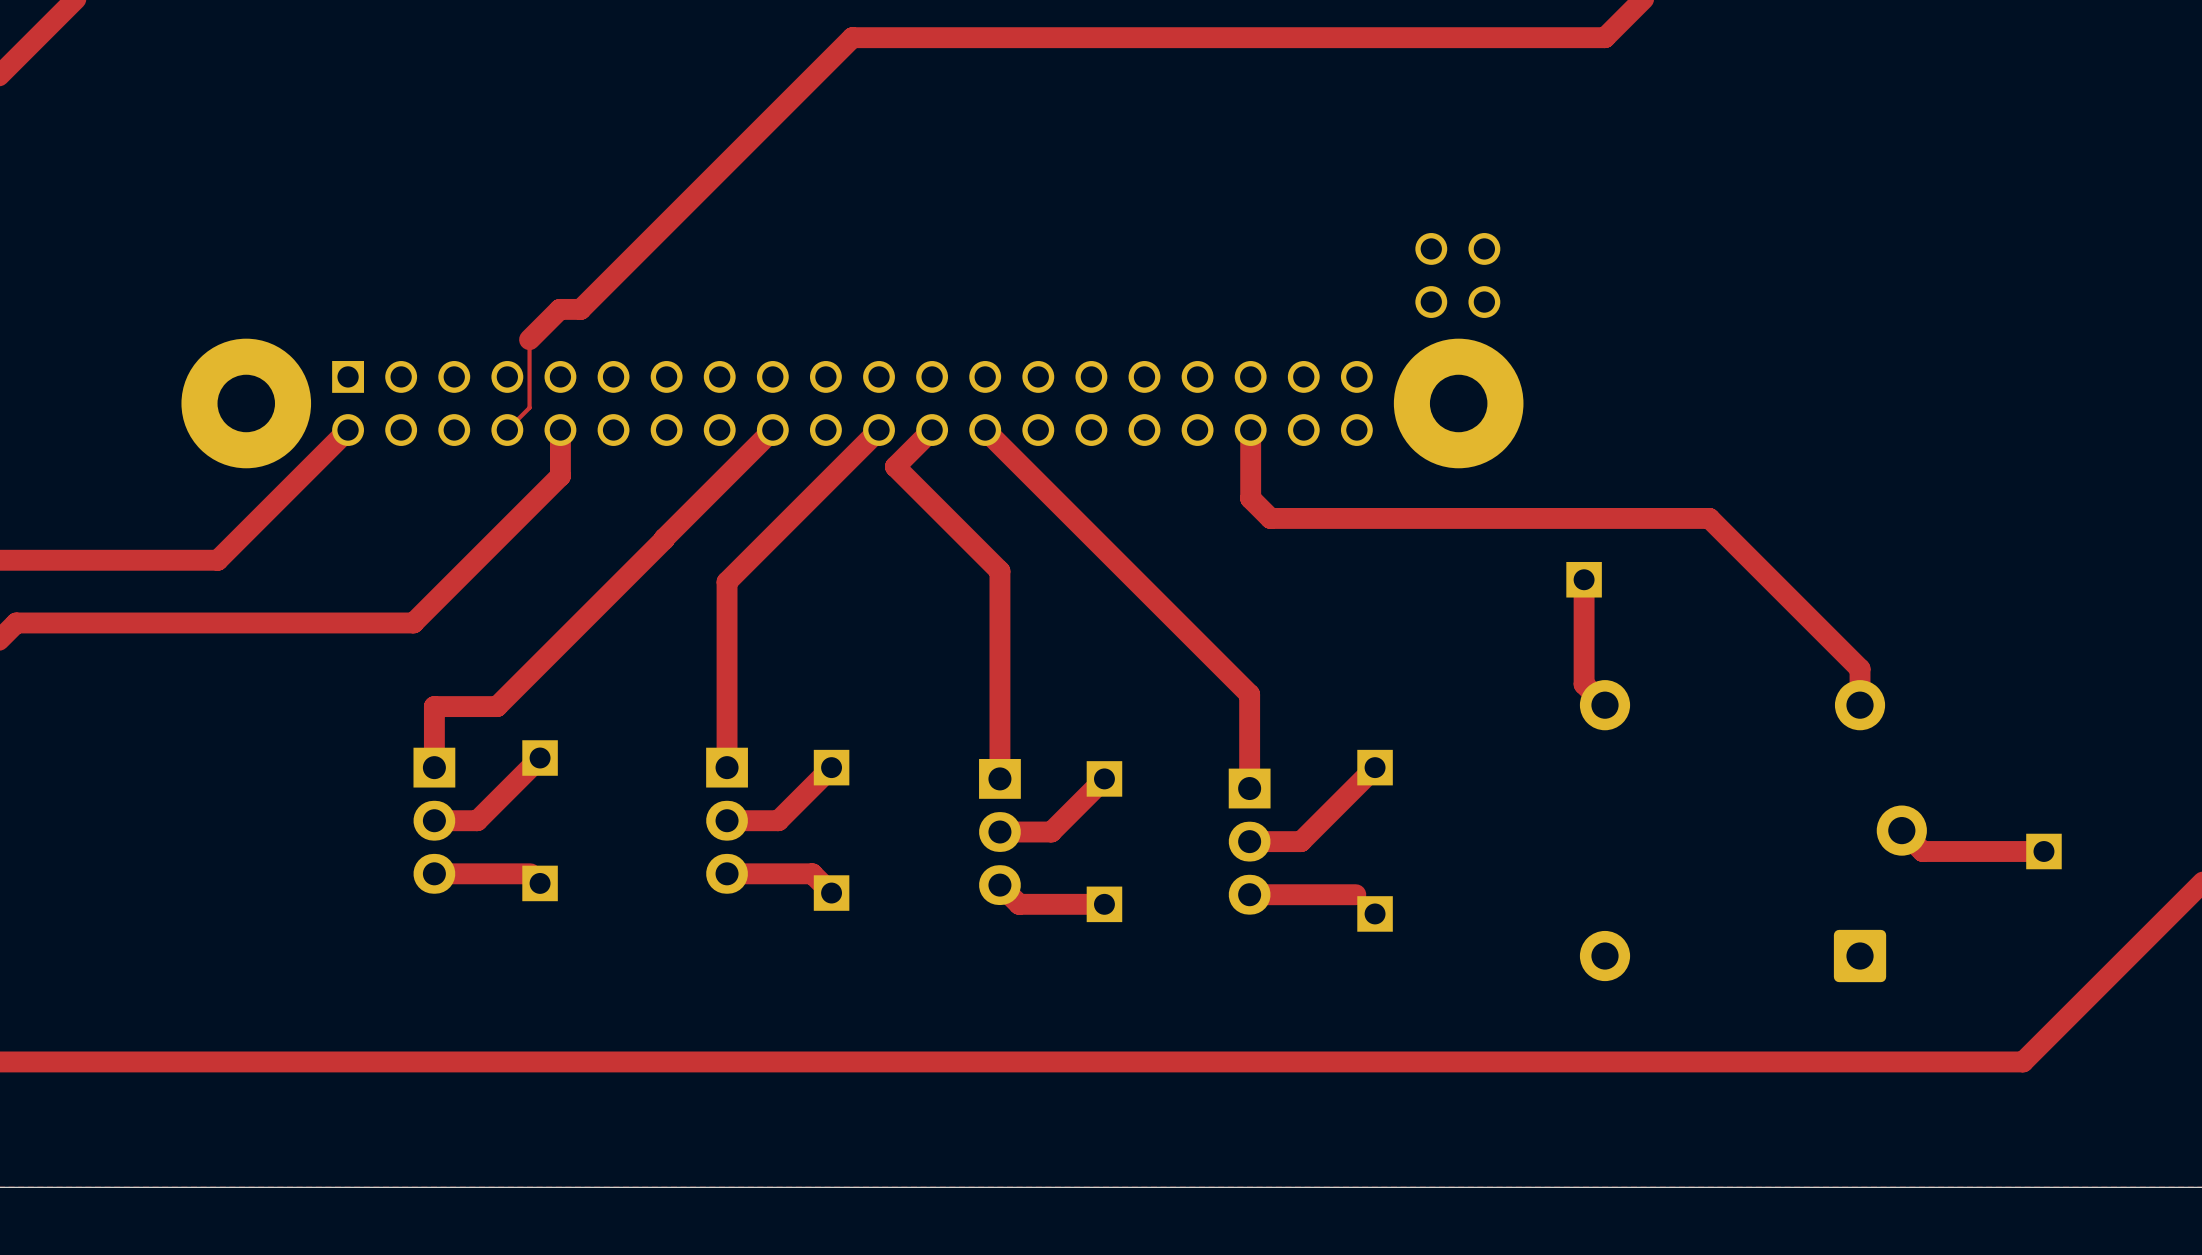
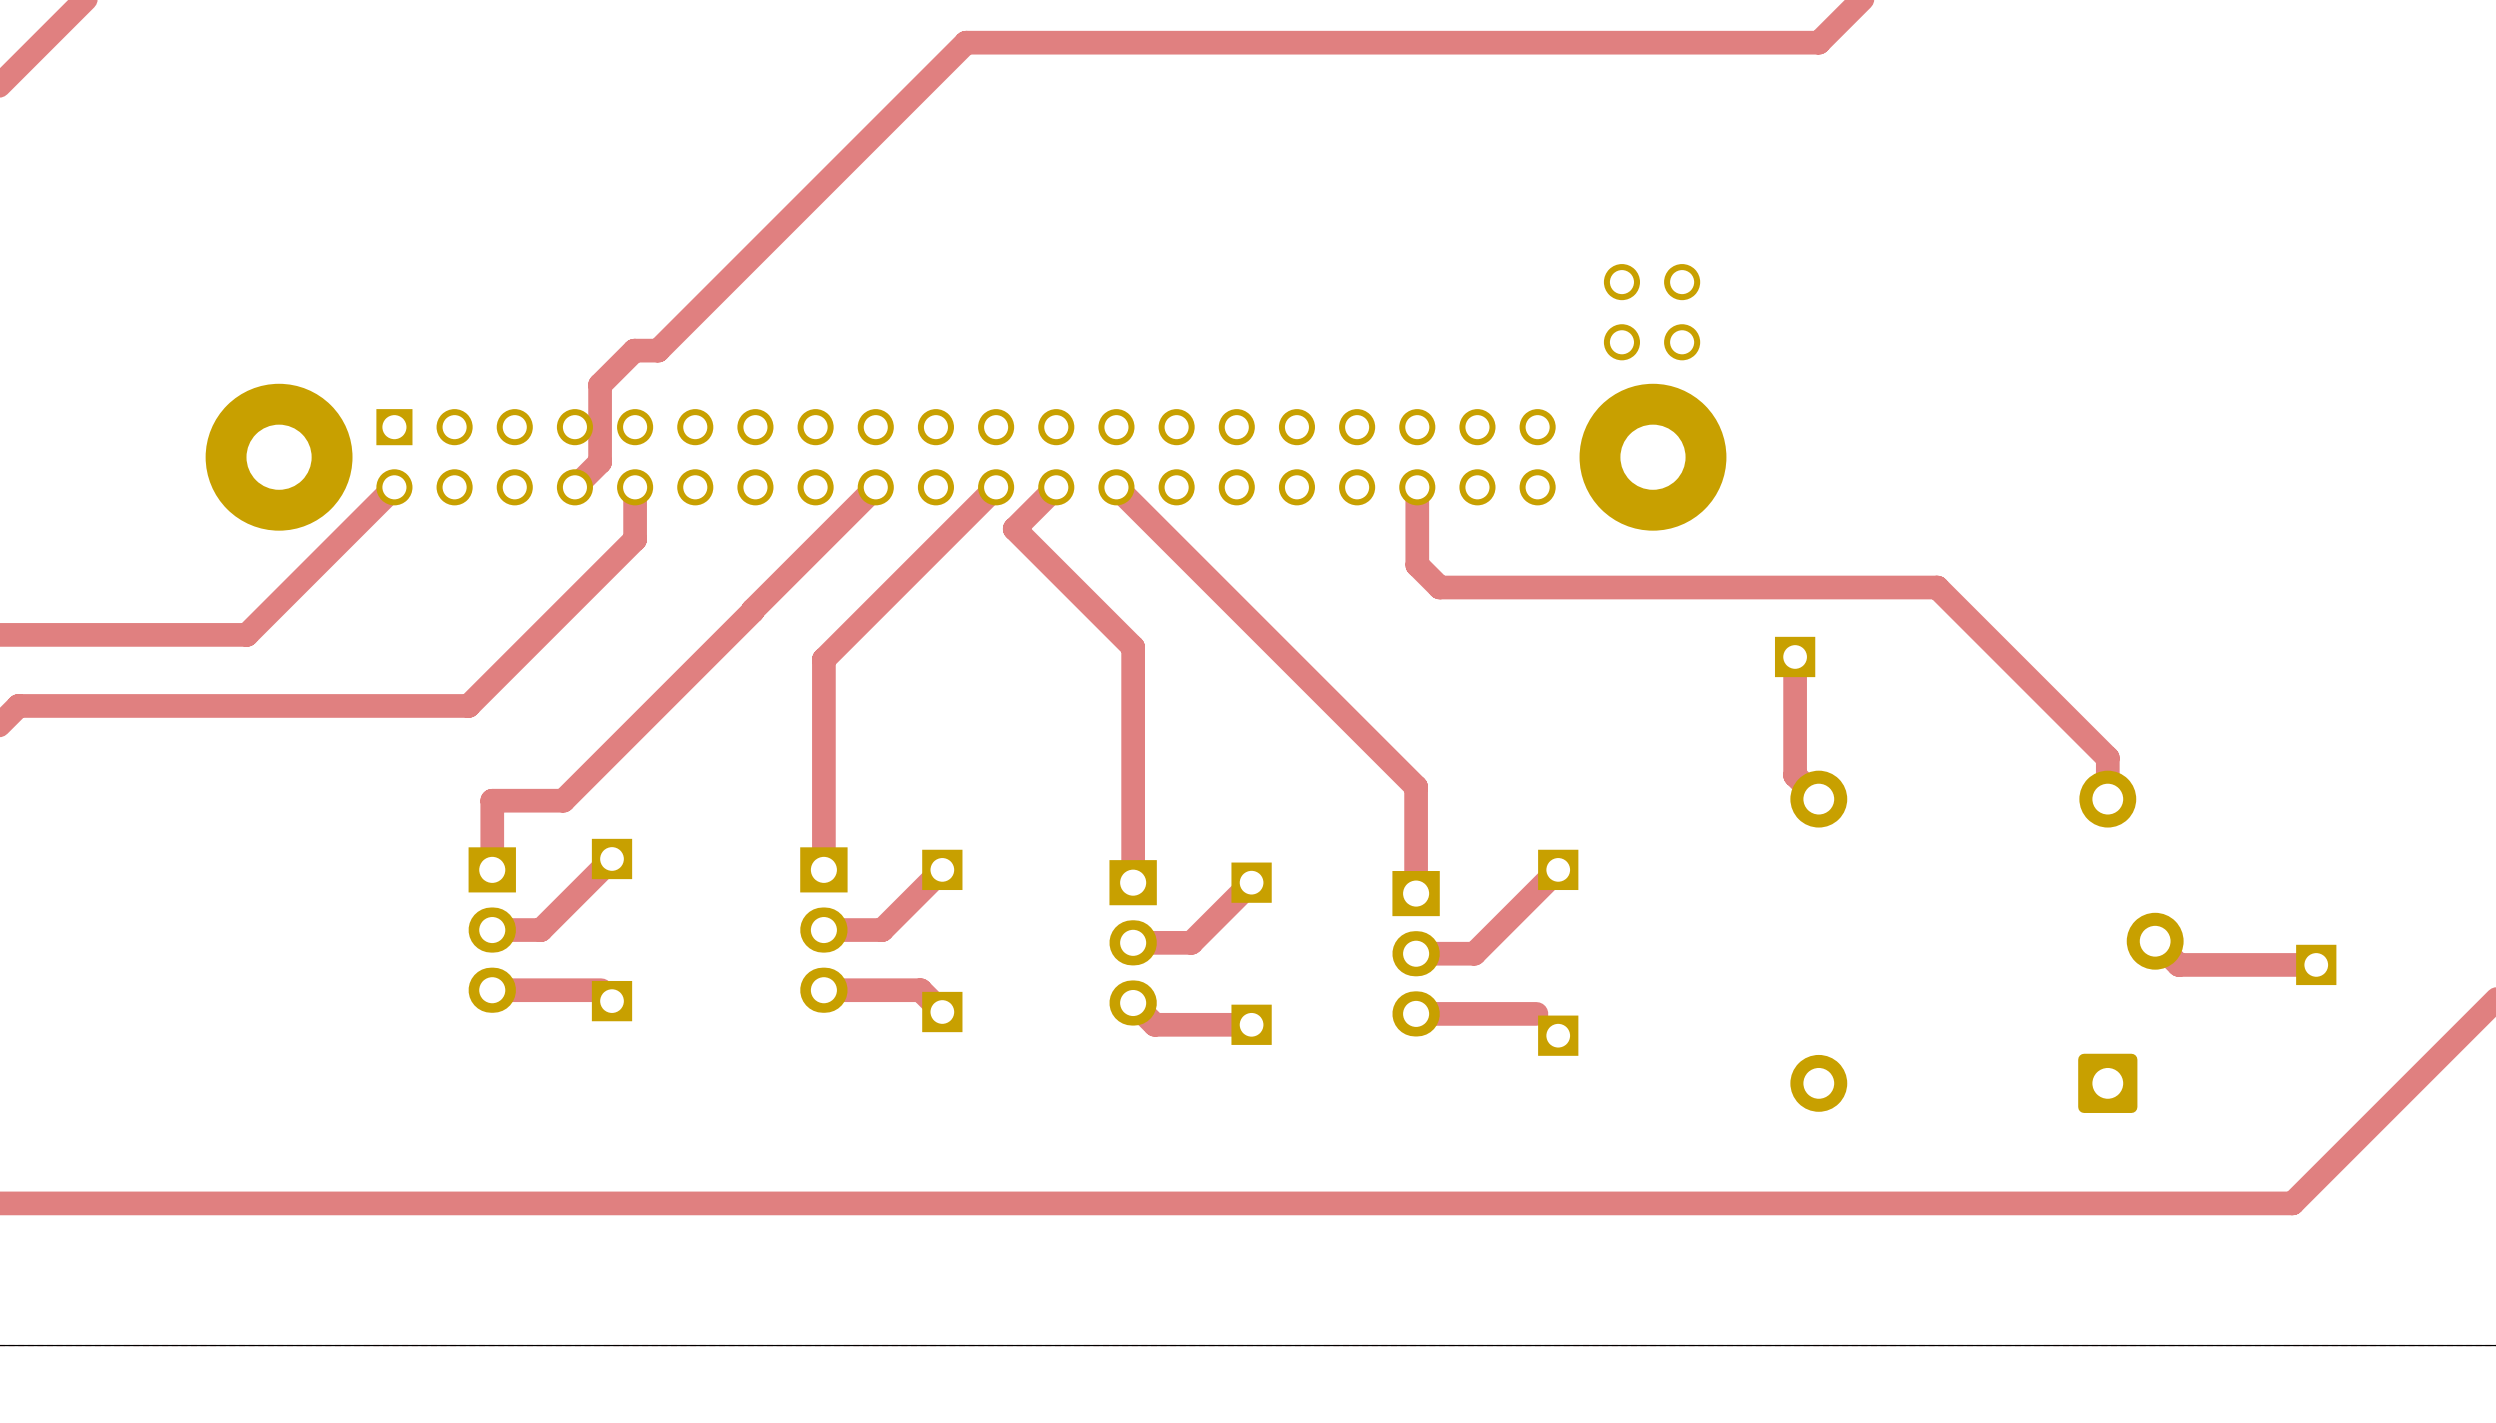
top track width: thin (529, 339) (529, 407) (507, 430) -> thick (600, 384) (600, 462) (574, 487)

